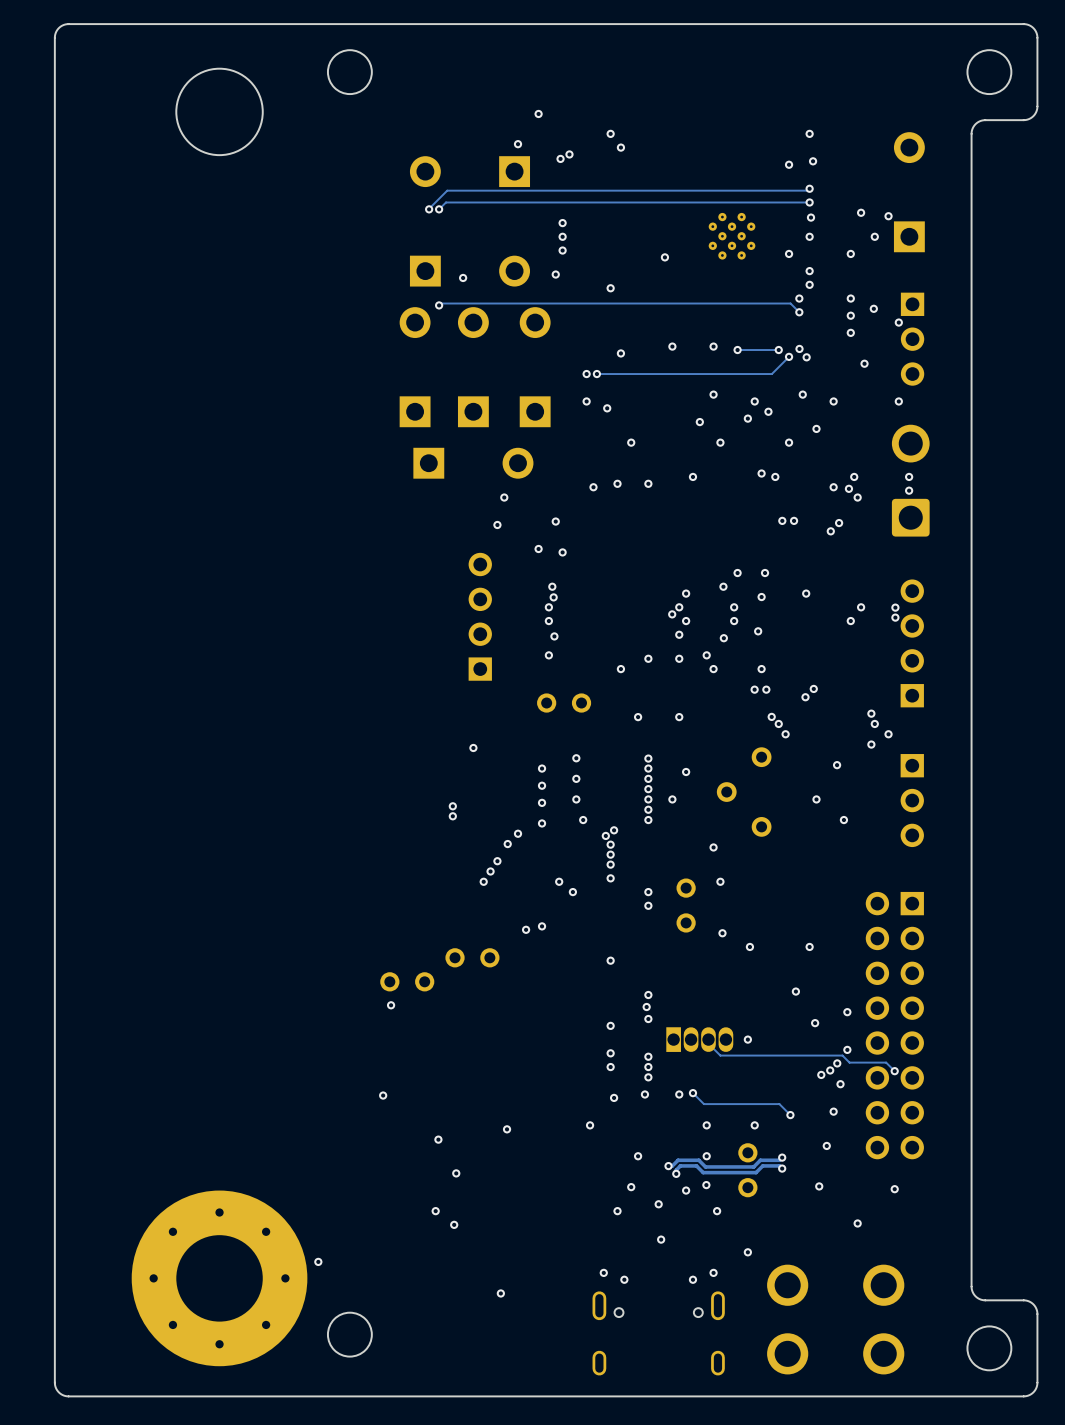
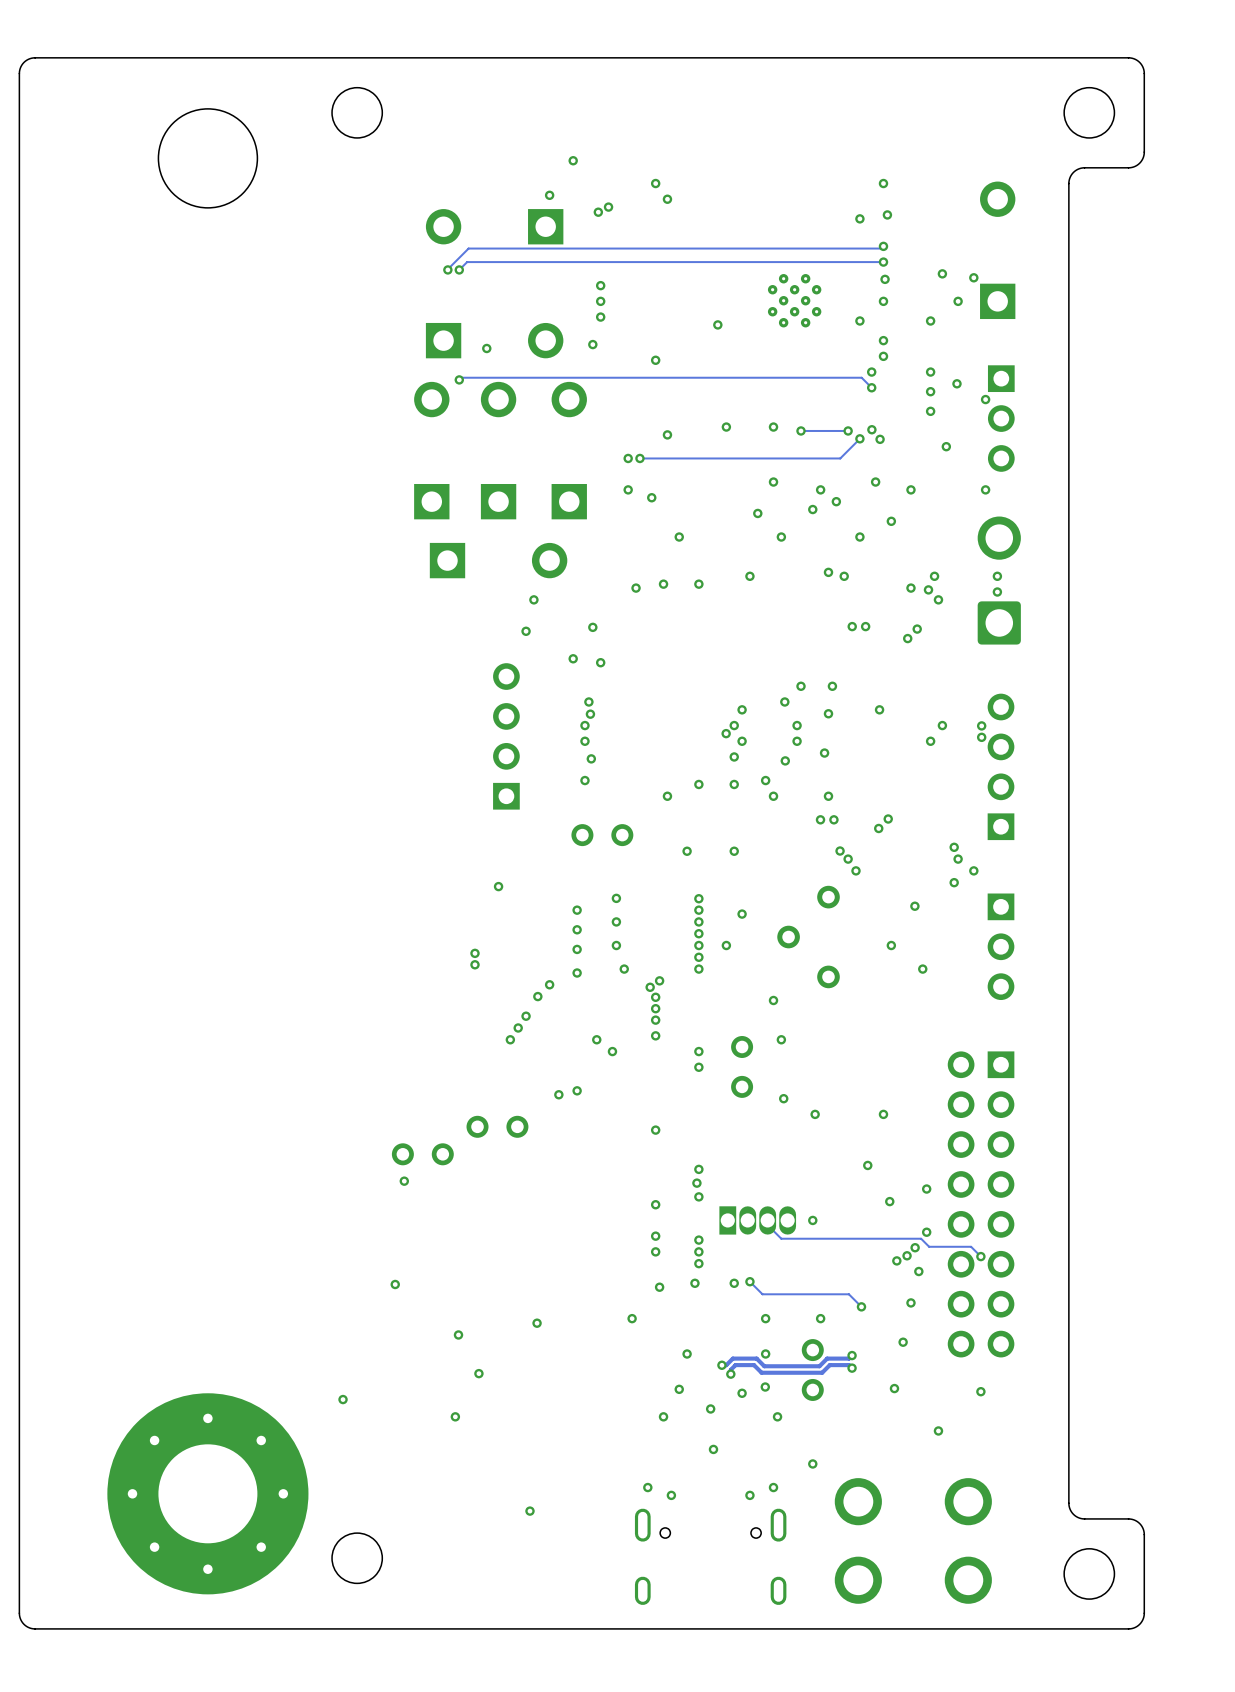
via: none -> (343, 1399)
via: (454, 1224) -> none
via: (318, 1261) -> none

